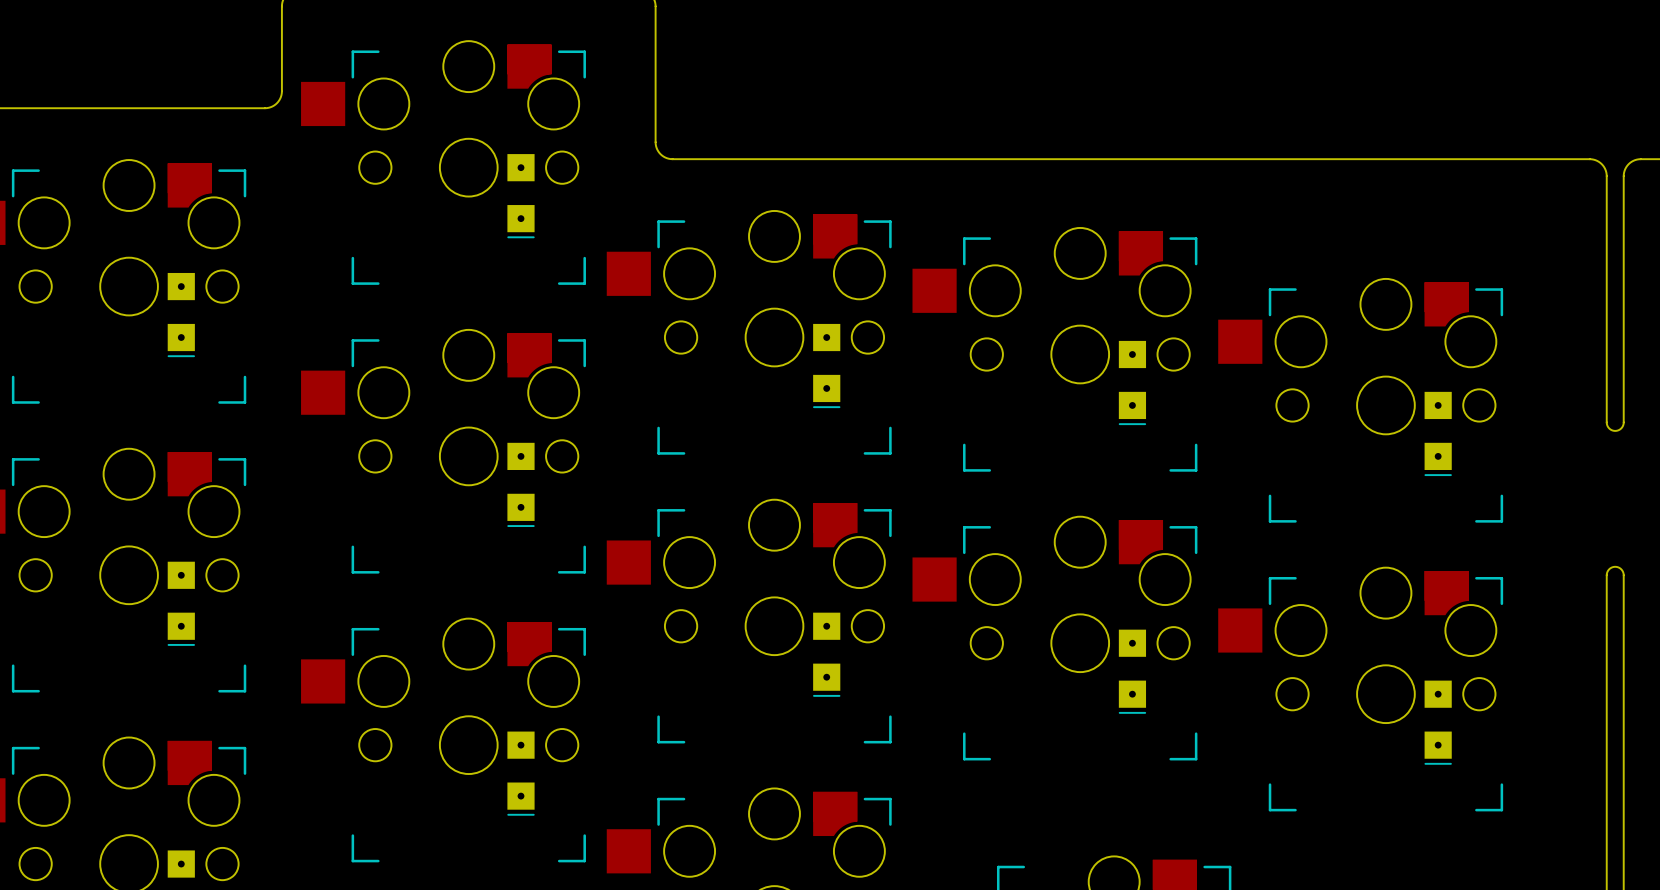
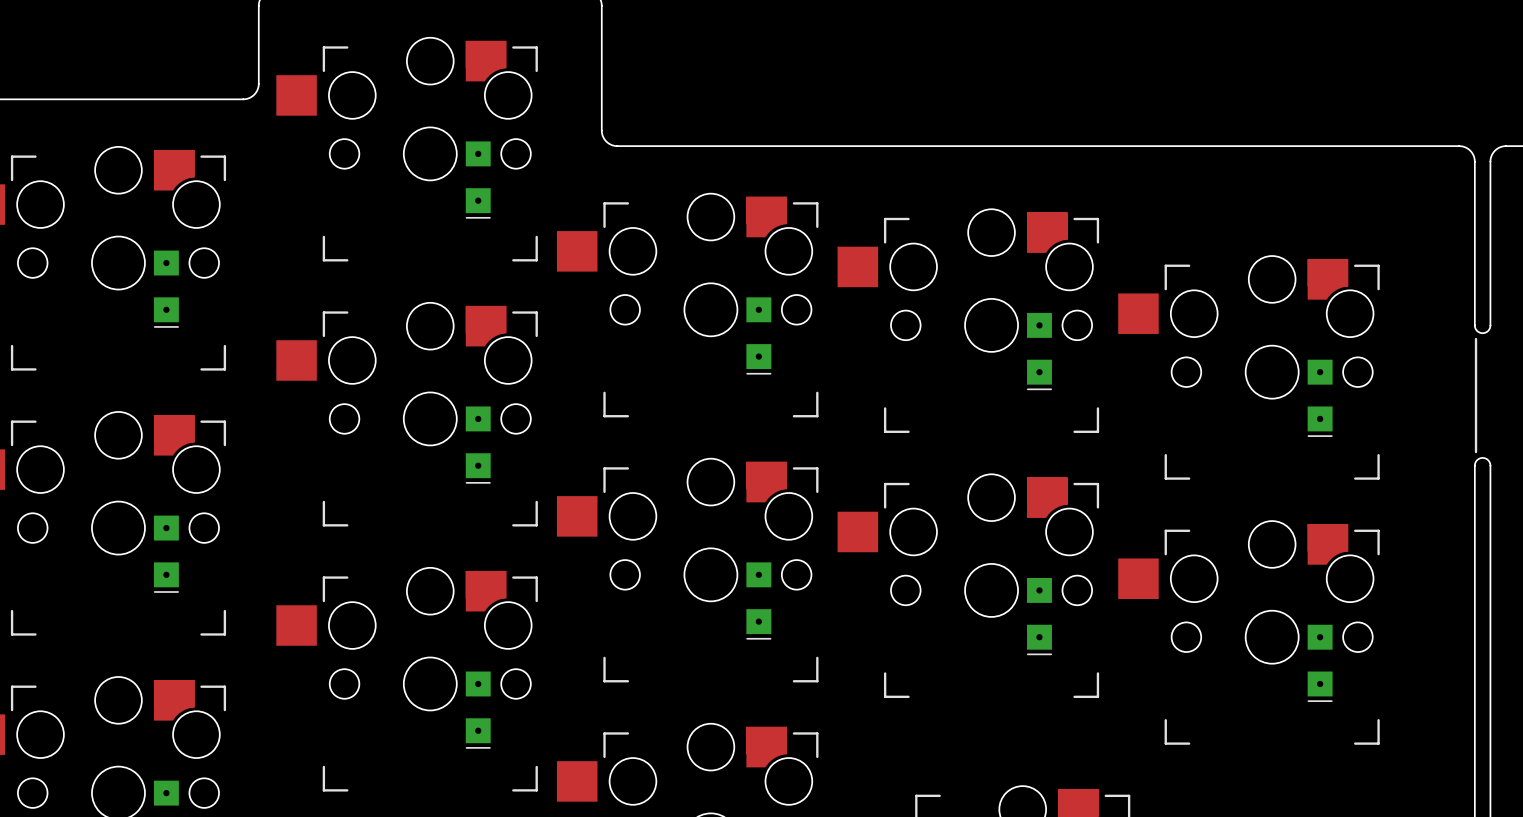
board edge: (1606, 354) (1606, 423) (1610, 429) (1615, 430) (1620, 429) (1623, 423) (1623, 354) -> (1474, 325) (1477, 330) (1482, 333) (1488, 330) (1490, 325)
line: none -> (1476, 339) (1476, 452)
board edge: (1606, 575) (1609, 569) (1615, 566) (1621, 569) (1623, 575) -> (1474, 528) (1474, 464) (1477, 459) (1482, 457) (1487, 459) (1490, 464) (1490, 528)

